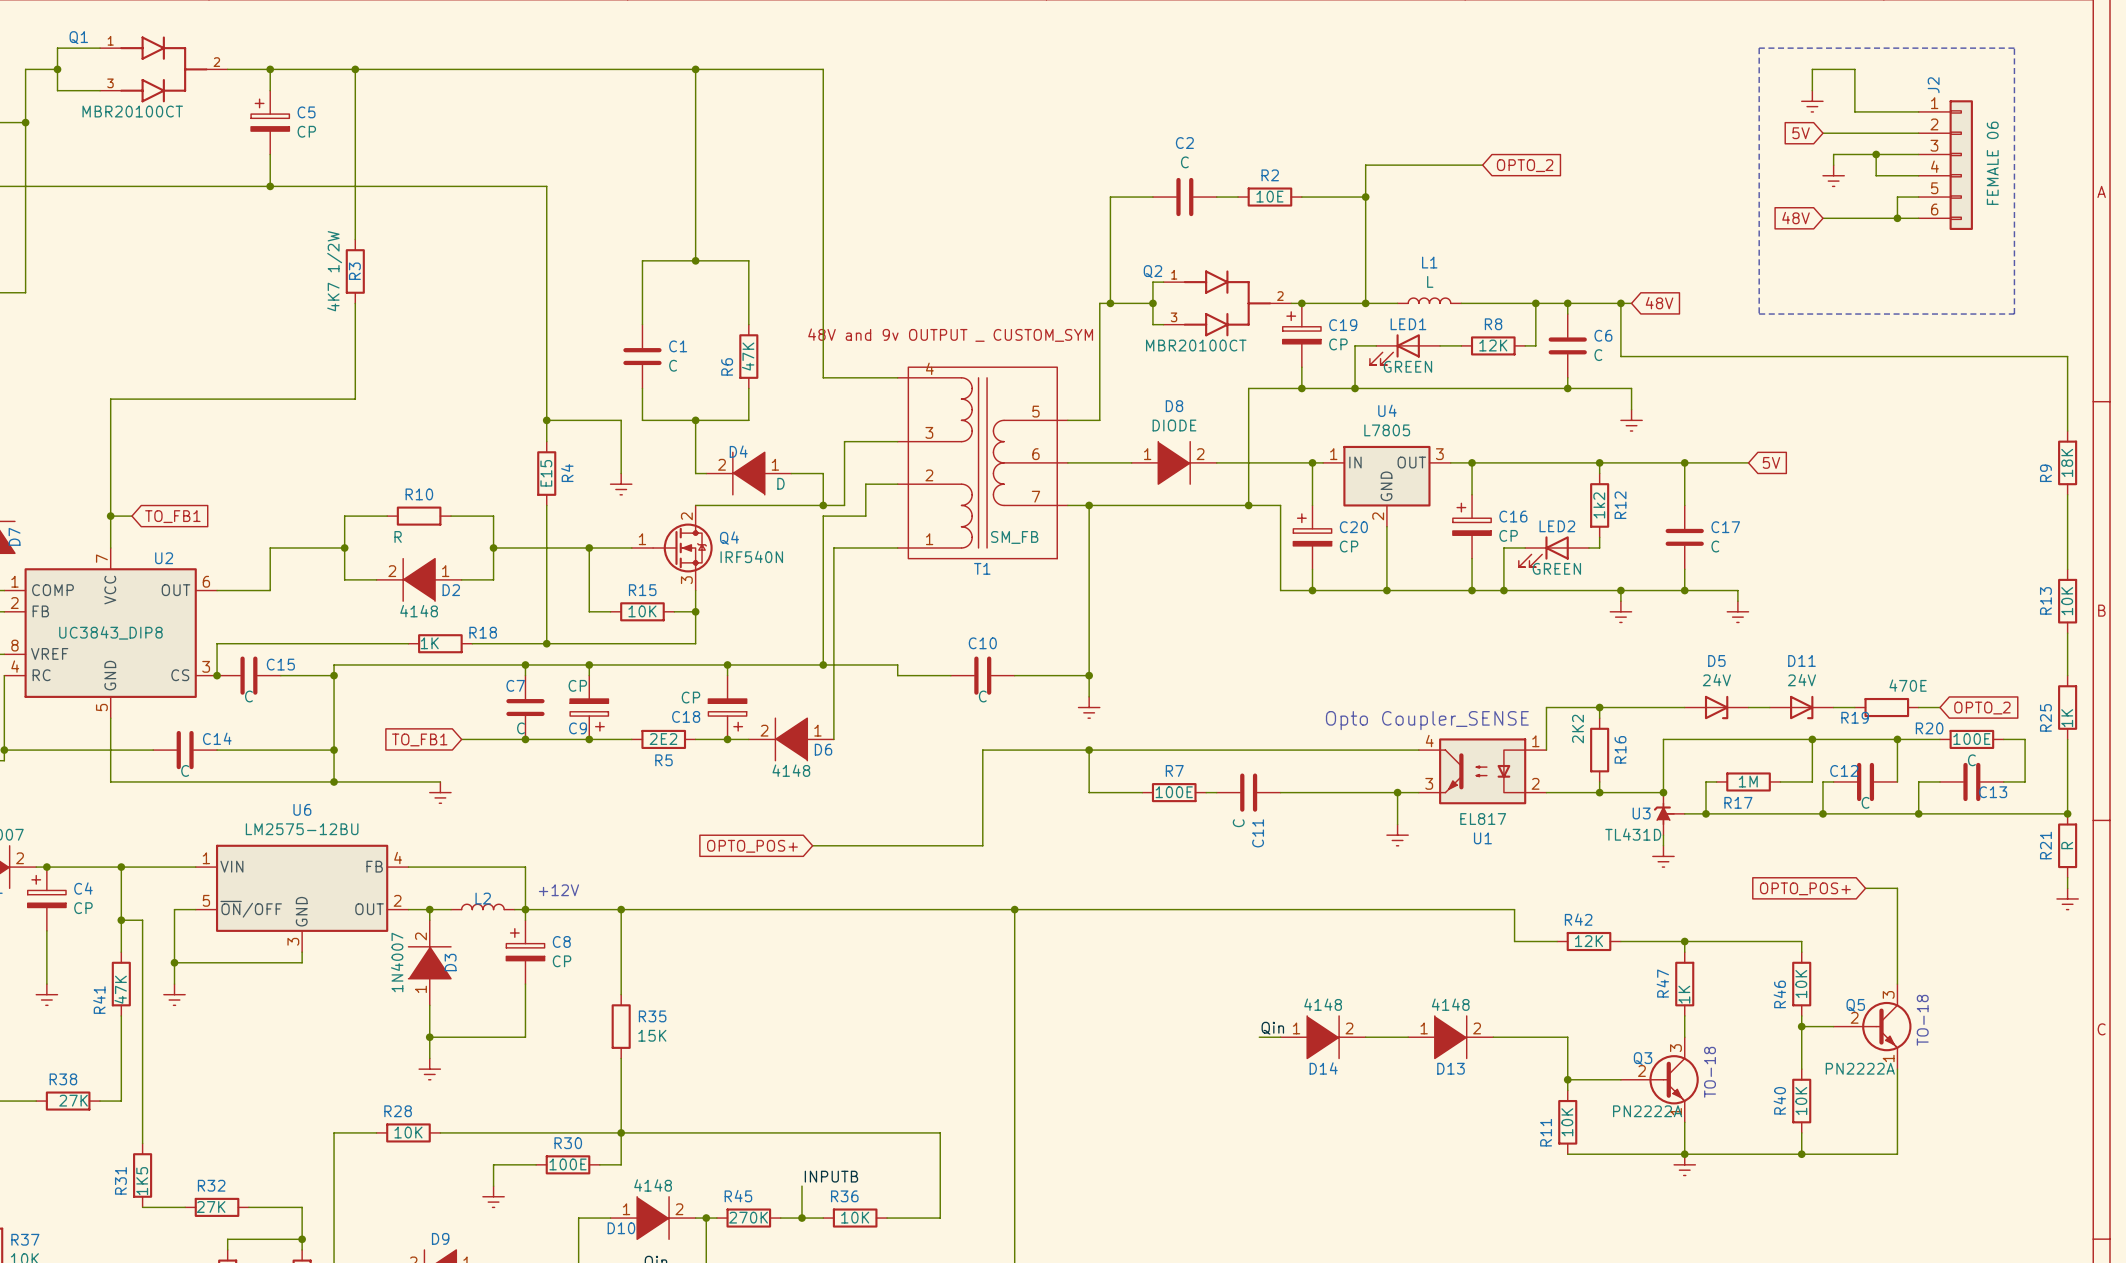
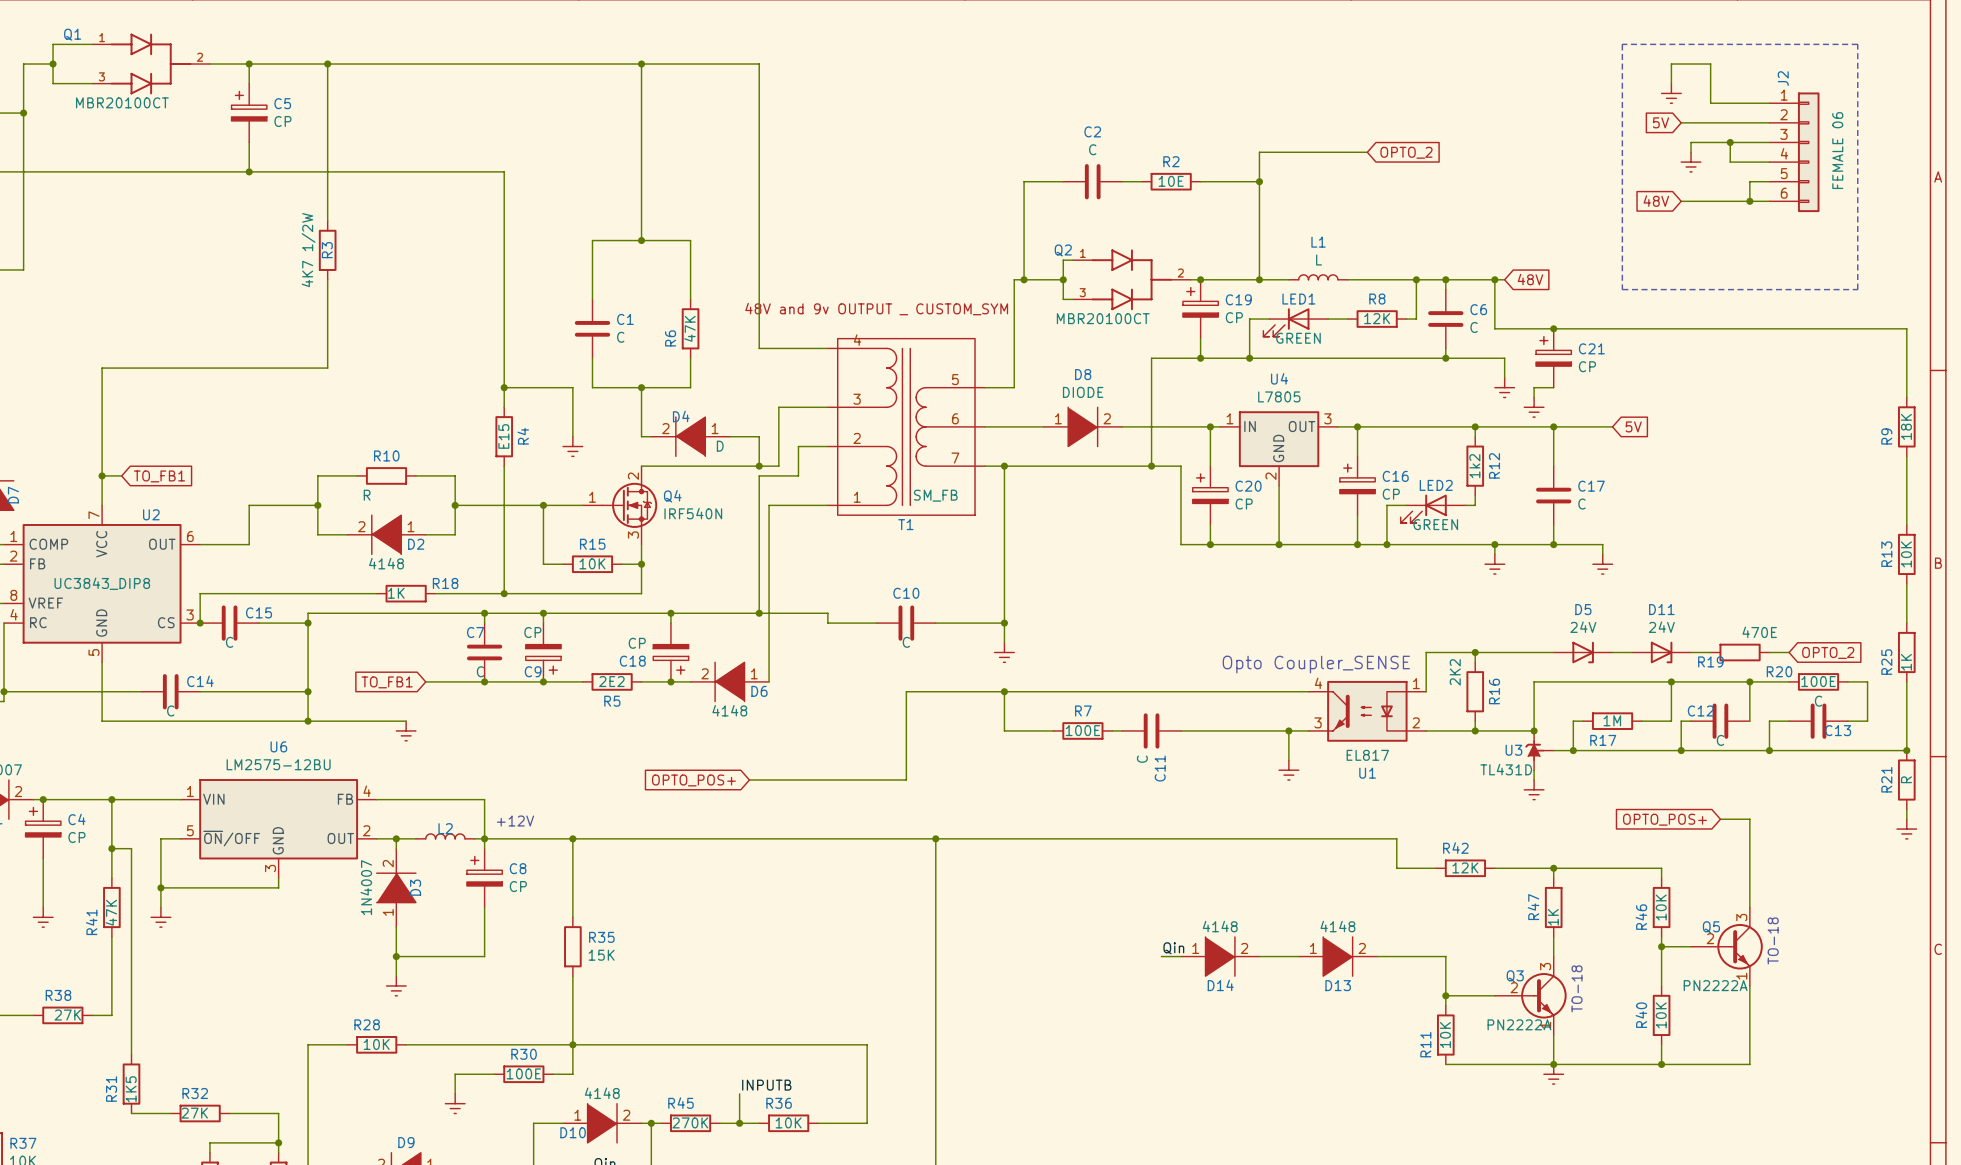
junction: none -> (1553, 328)
C21: none -> CP (1553, 358)
wire: none -> (1553, 387) (1534, 387) (1534, 397)
power symbol: none -> (1534, 407)

